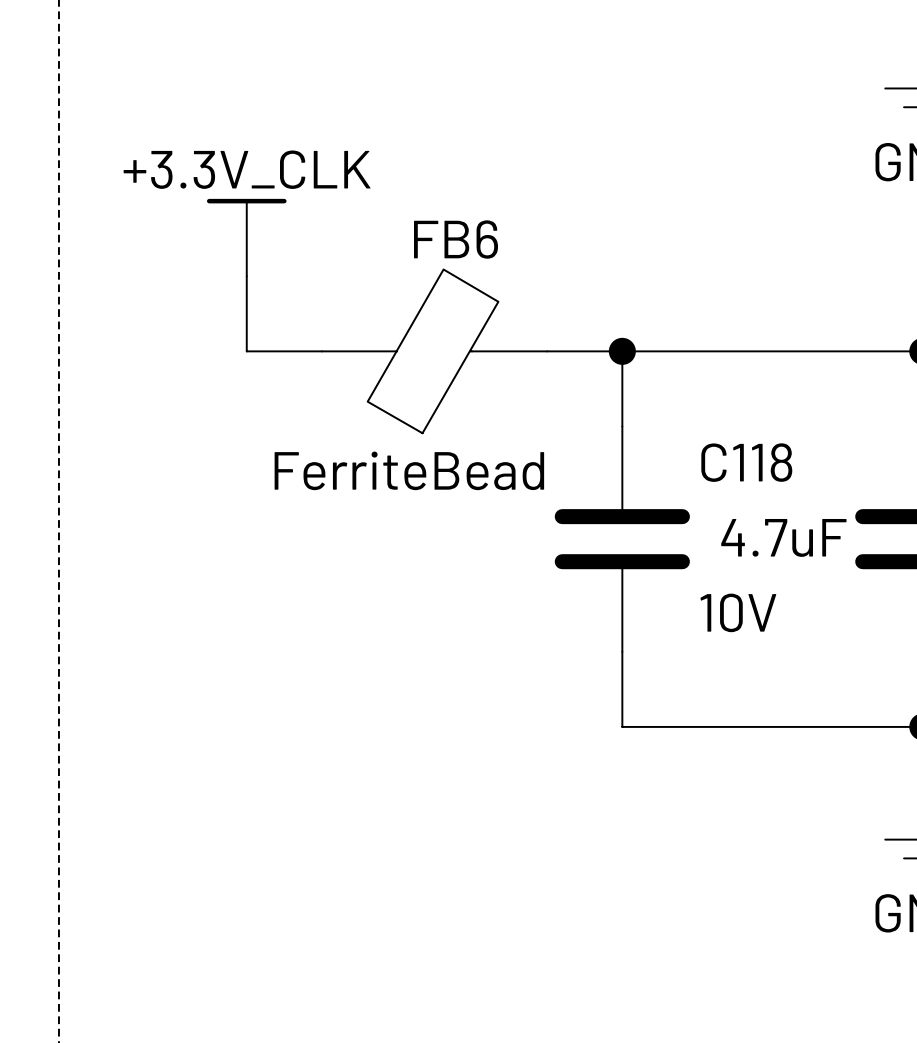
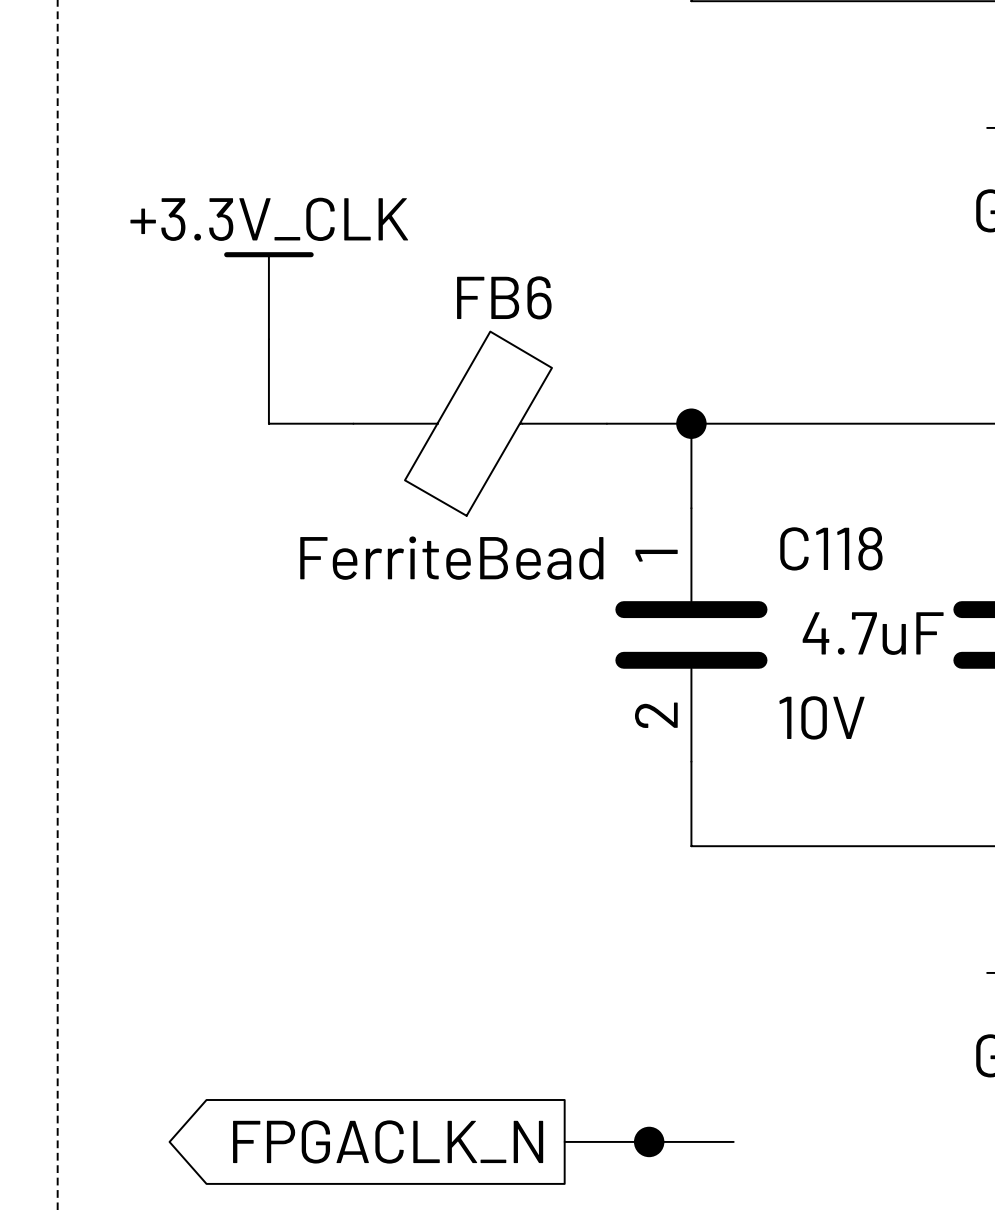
C118 pin number: none -> 1 (656, 555)
C118 pin number: none -> 2 (656, 715)
global label: none -> FPGACLK_N (388, 1141)
wire: none -> (564, 1141) (733, 1141)
junction: none -> (649, 1141)

